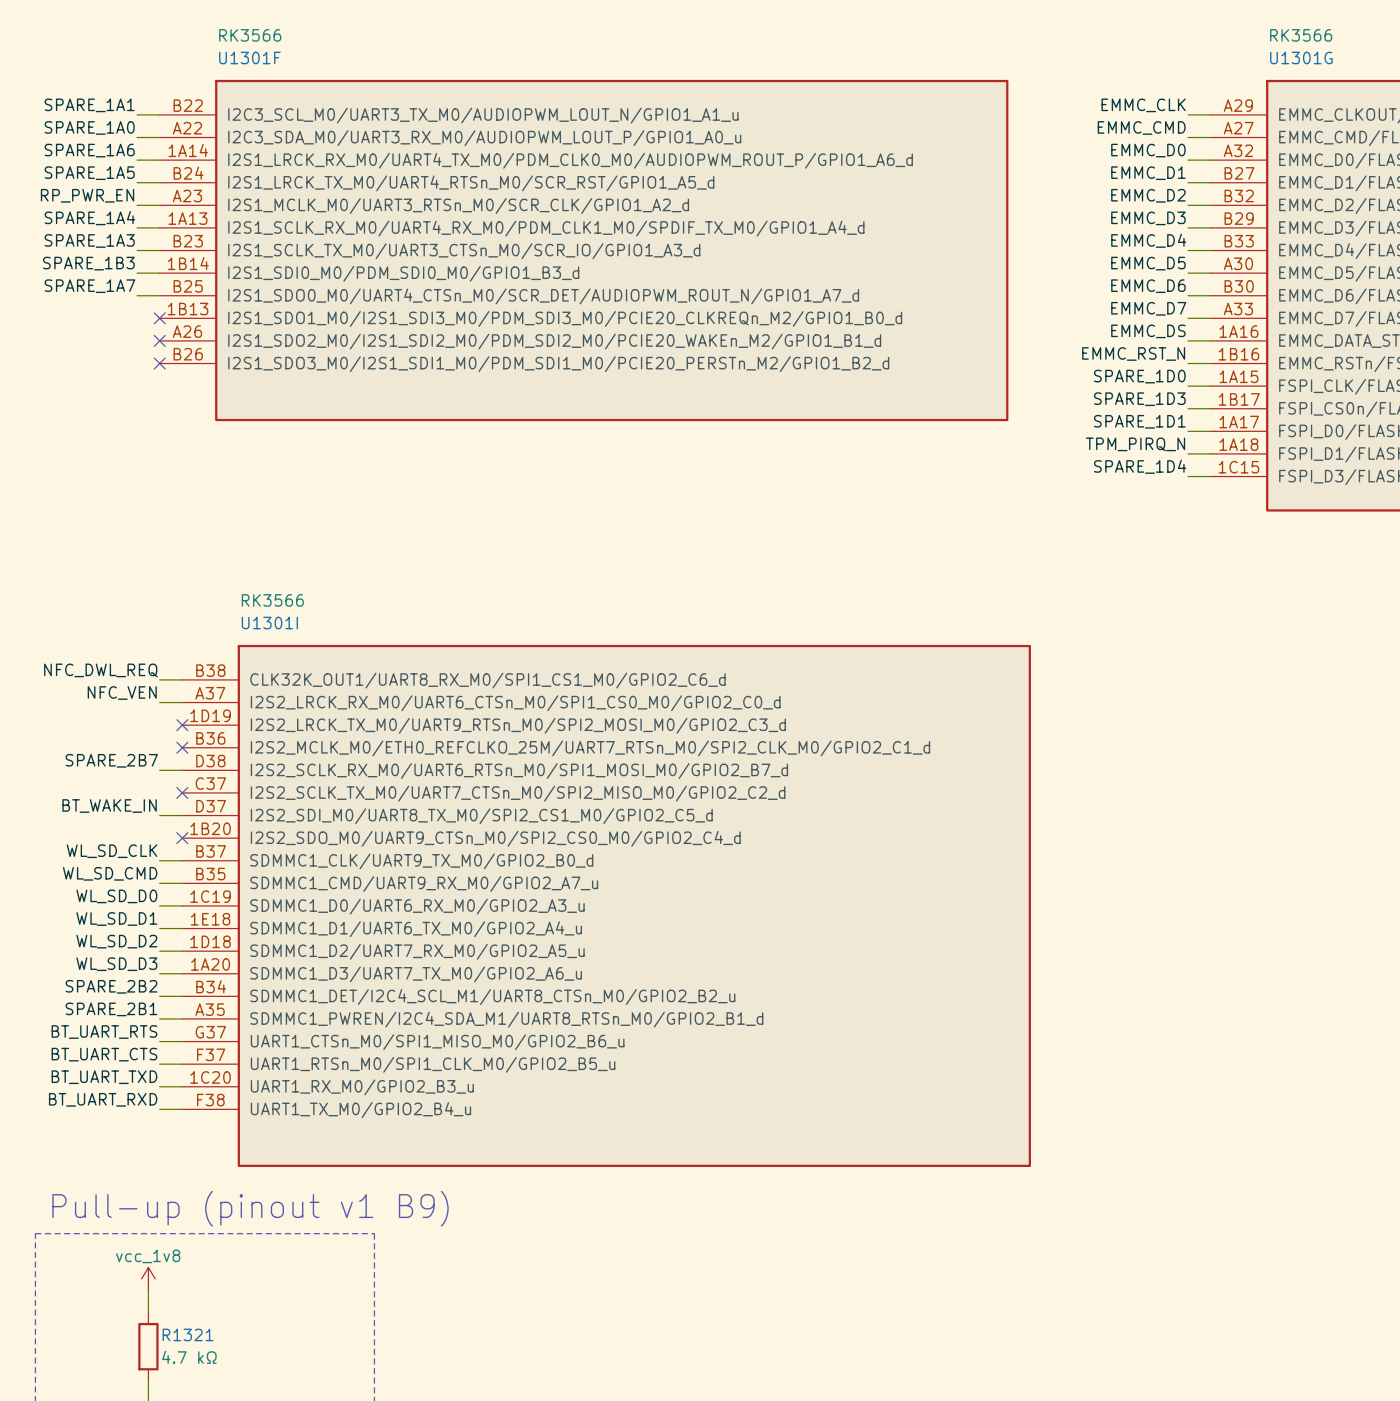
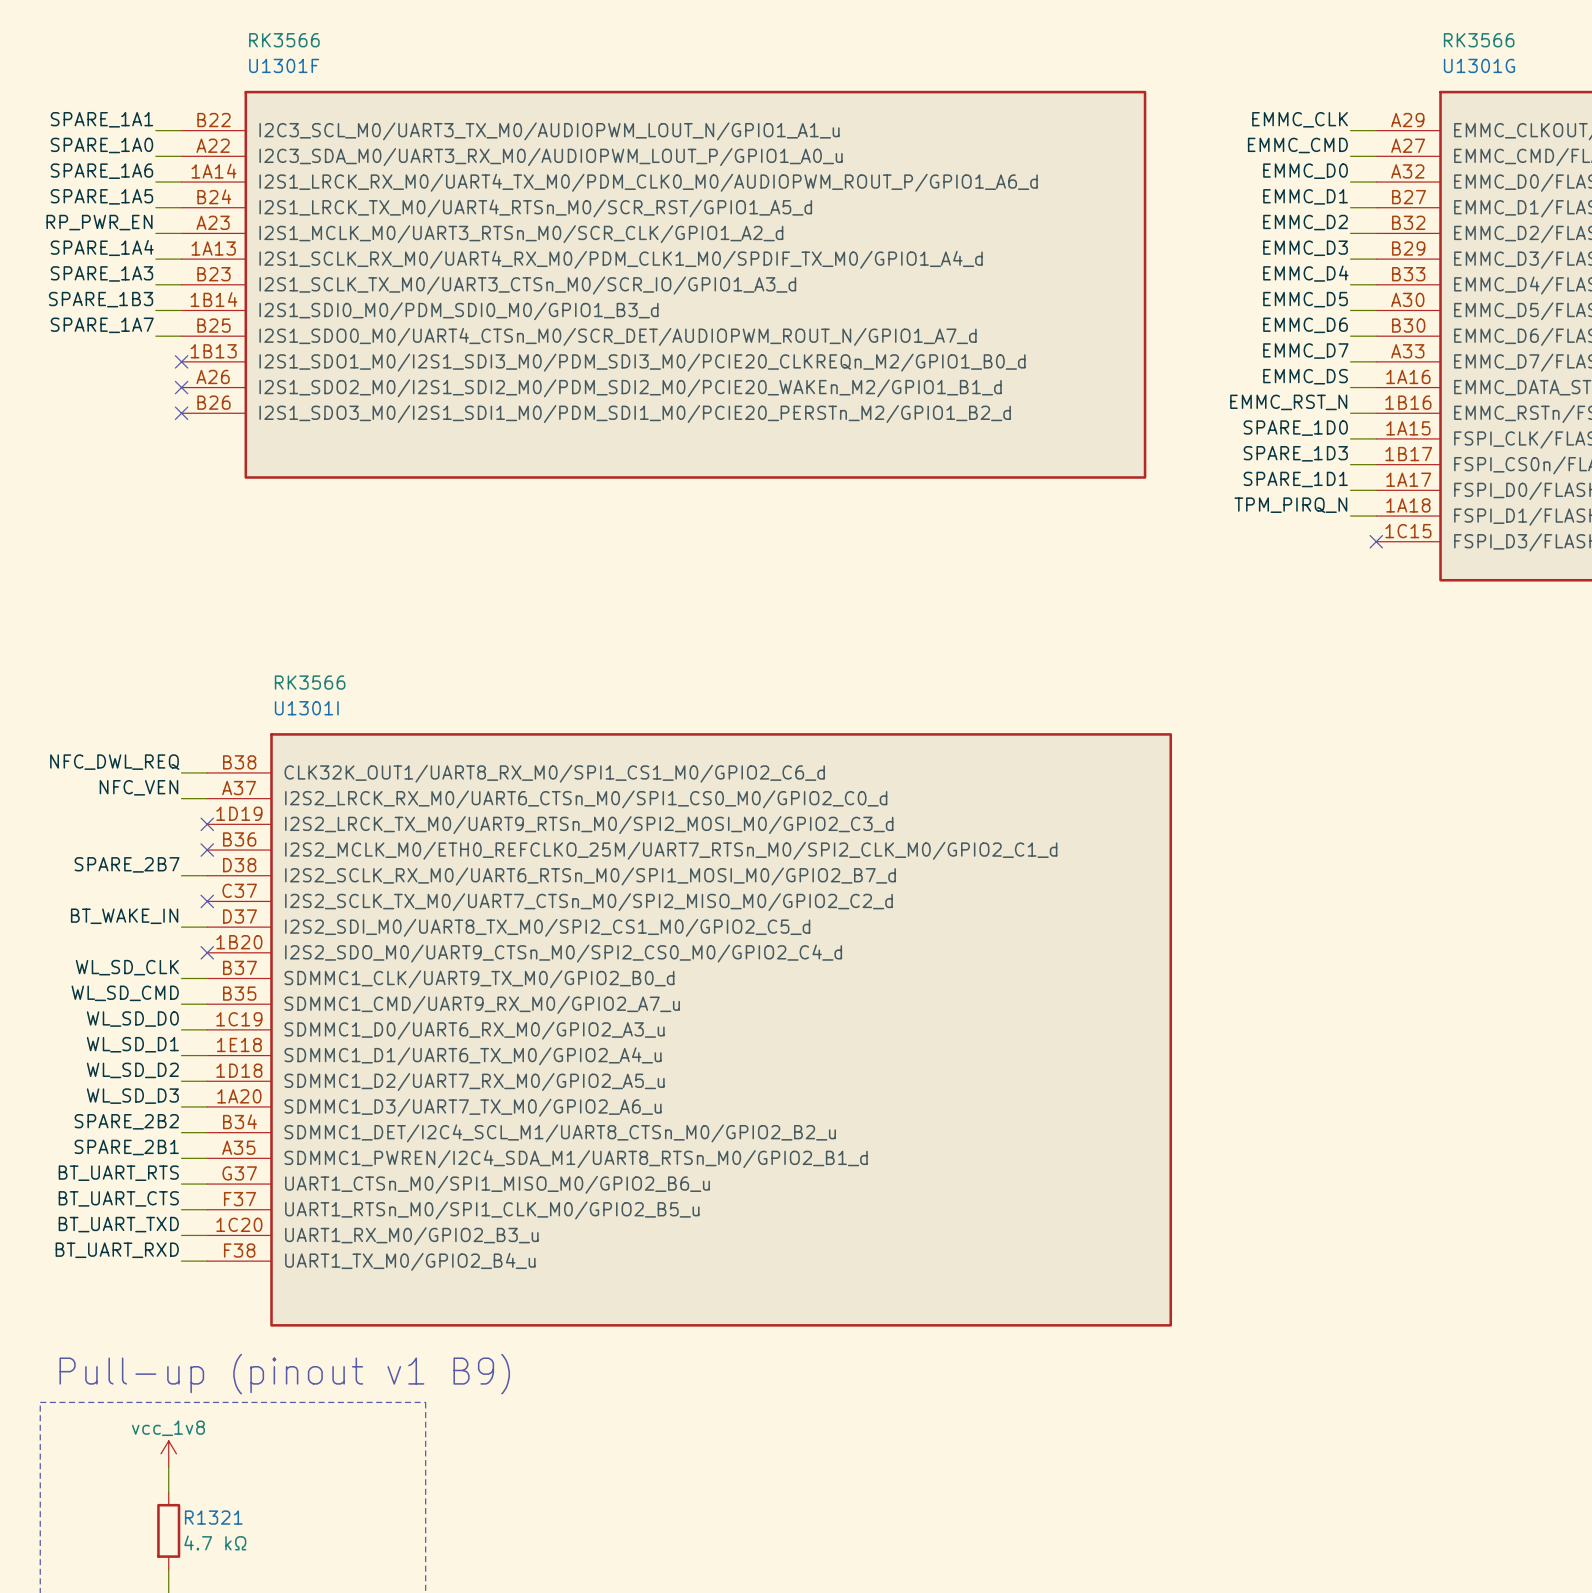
label: SPARE_1D4 (1140, 466) -> none
wire: (1188, 476) (1210, 476) -> none
no-connect mark: none -> (1376, 541)

